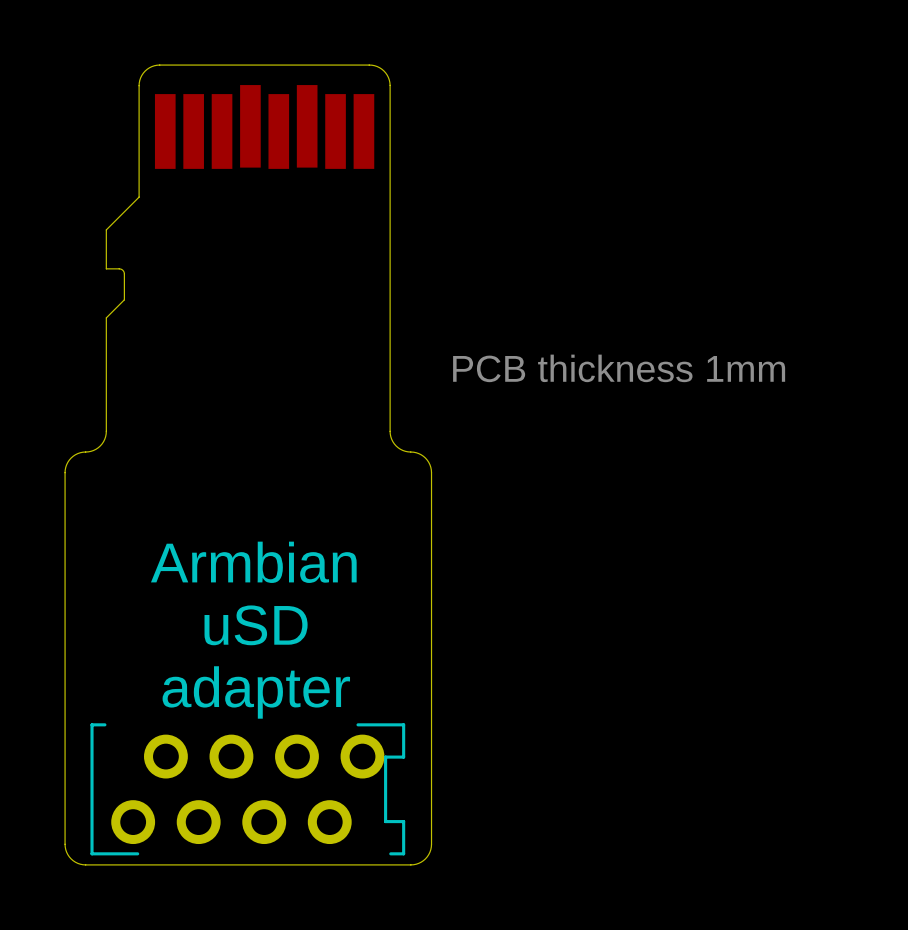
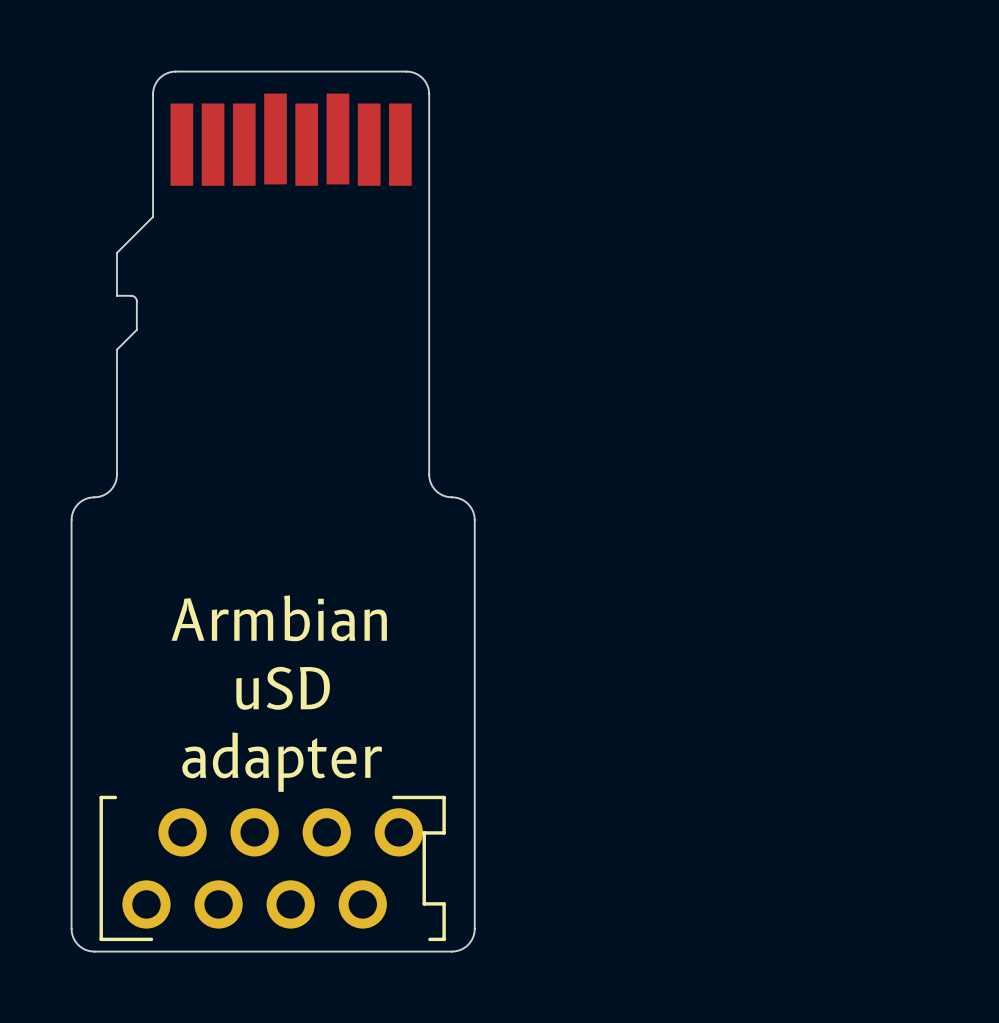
text: PCB thickness 1mm (619, 368) -> none

